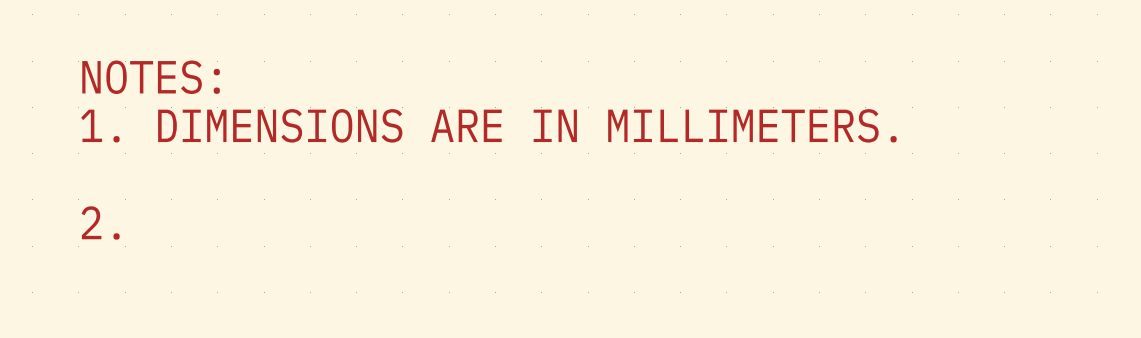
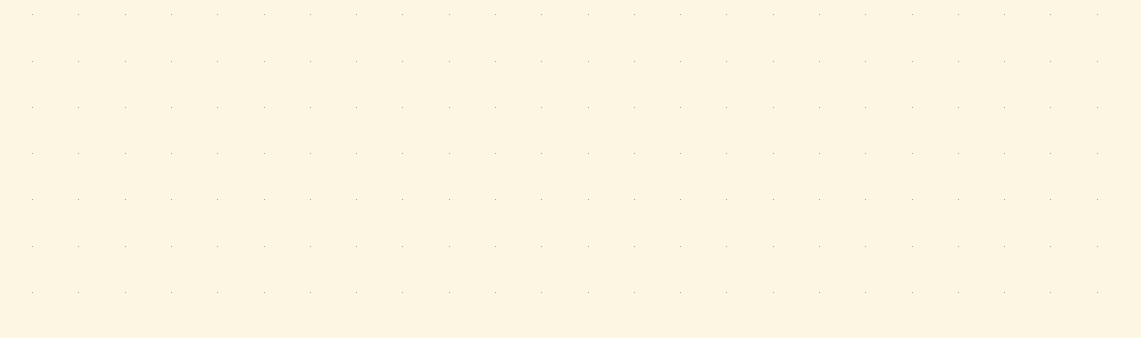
text: NOTES: (151, 77) -> none
text: 1. DIMENSIONS ARE IN MILLIMETERS. (488, 125) -> none
text: 2. (100, 222) -> none

